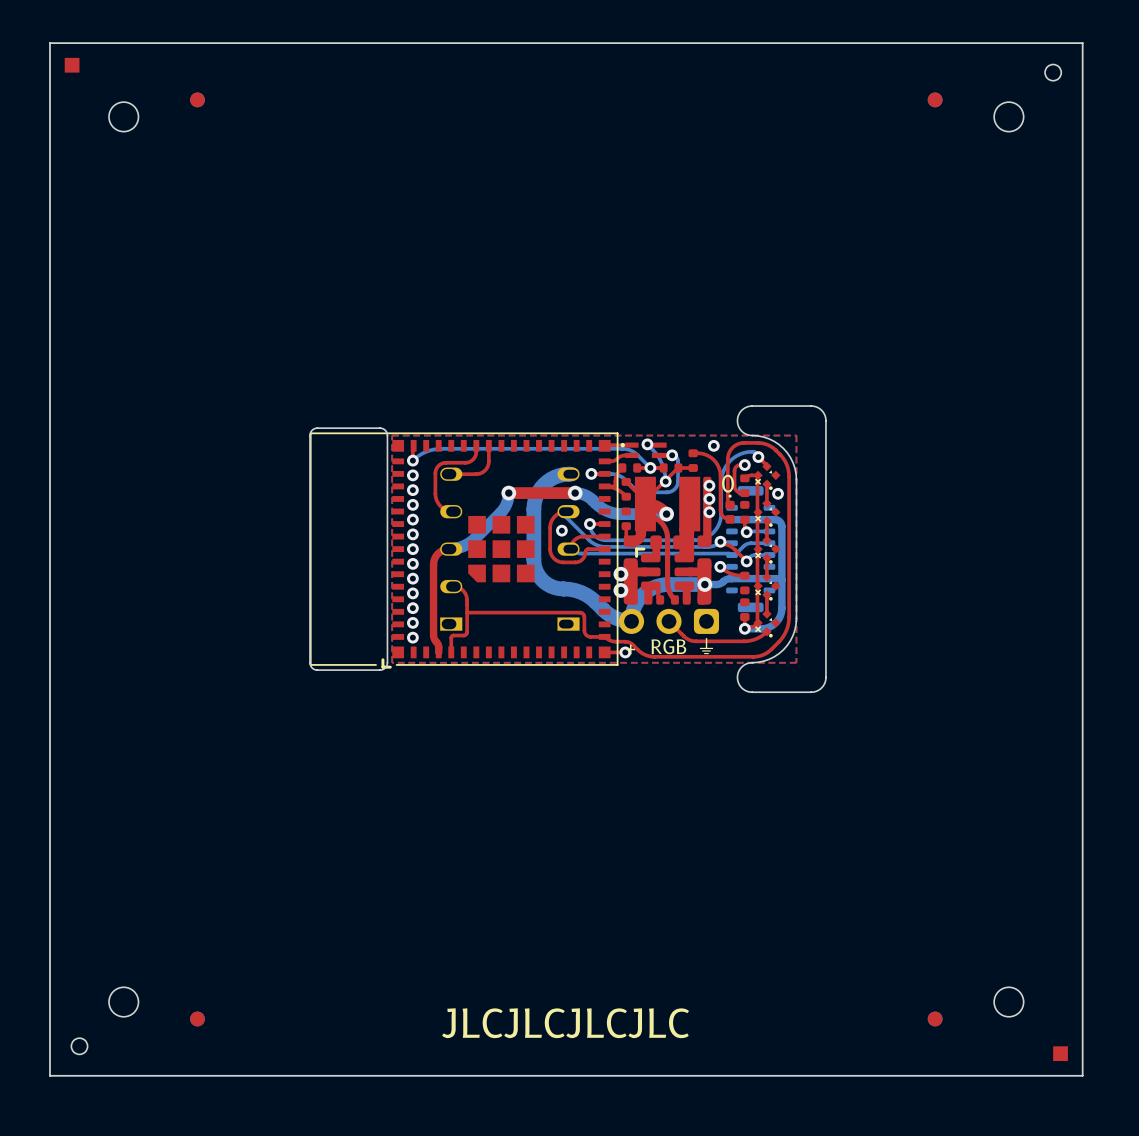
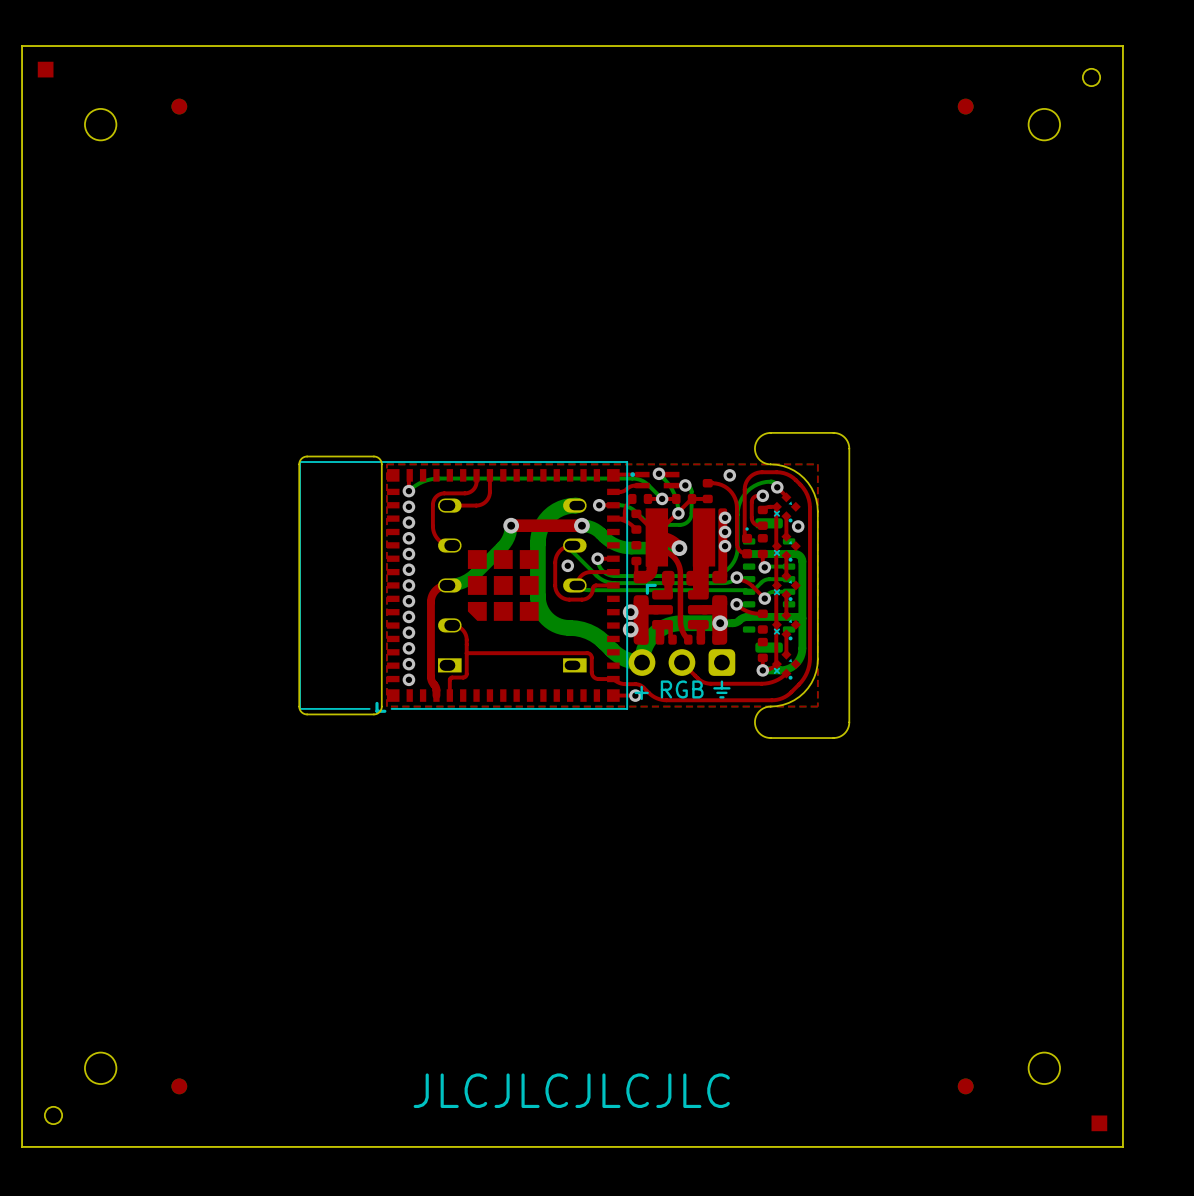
text: 0 (728, 483) -> none

